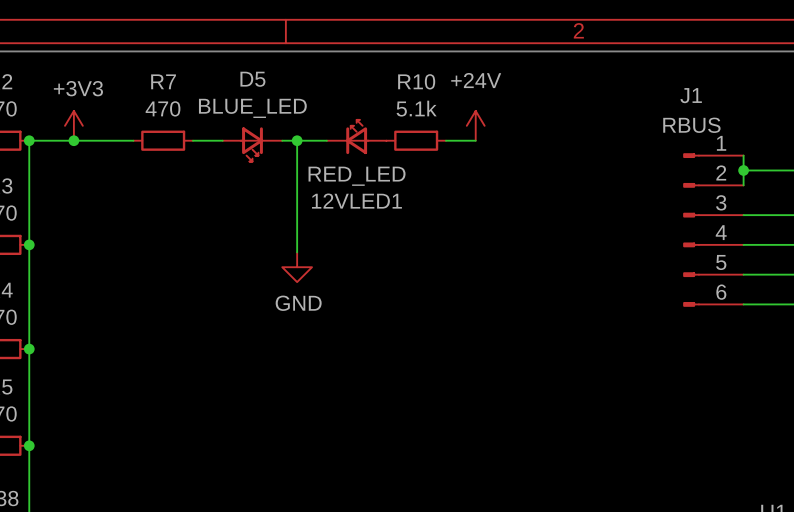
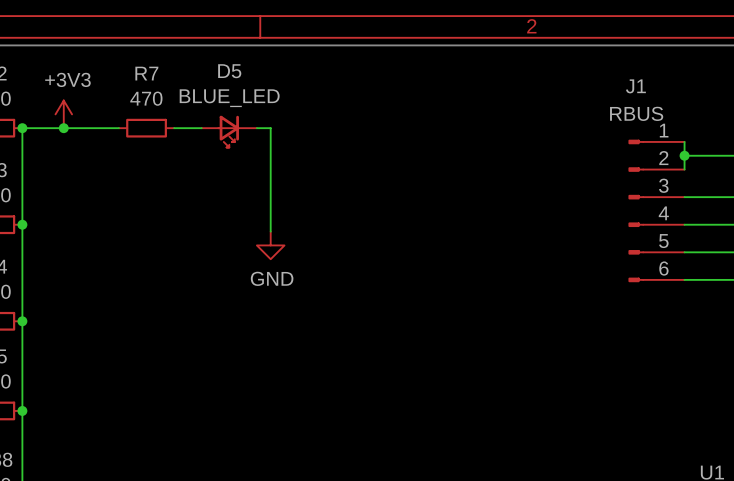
power symbol: +24V (475, 125) -> none
12VLED1: RED_LED (356, 137) -> none
wire: (297, 140) (326, 140) -> none
junction: (297, 140) -> none
R10: 5.1k (416, 140) -> none
wire: (445, 140) (475, 140) -> none

